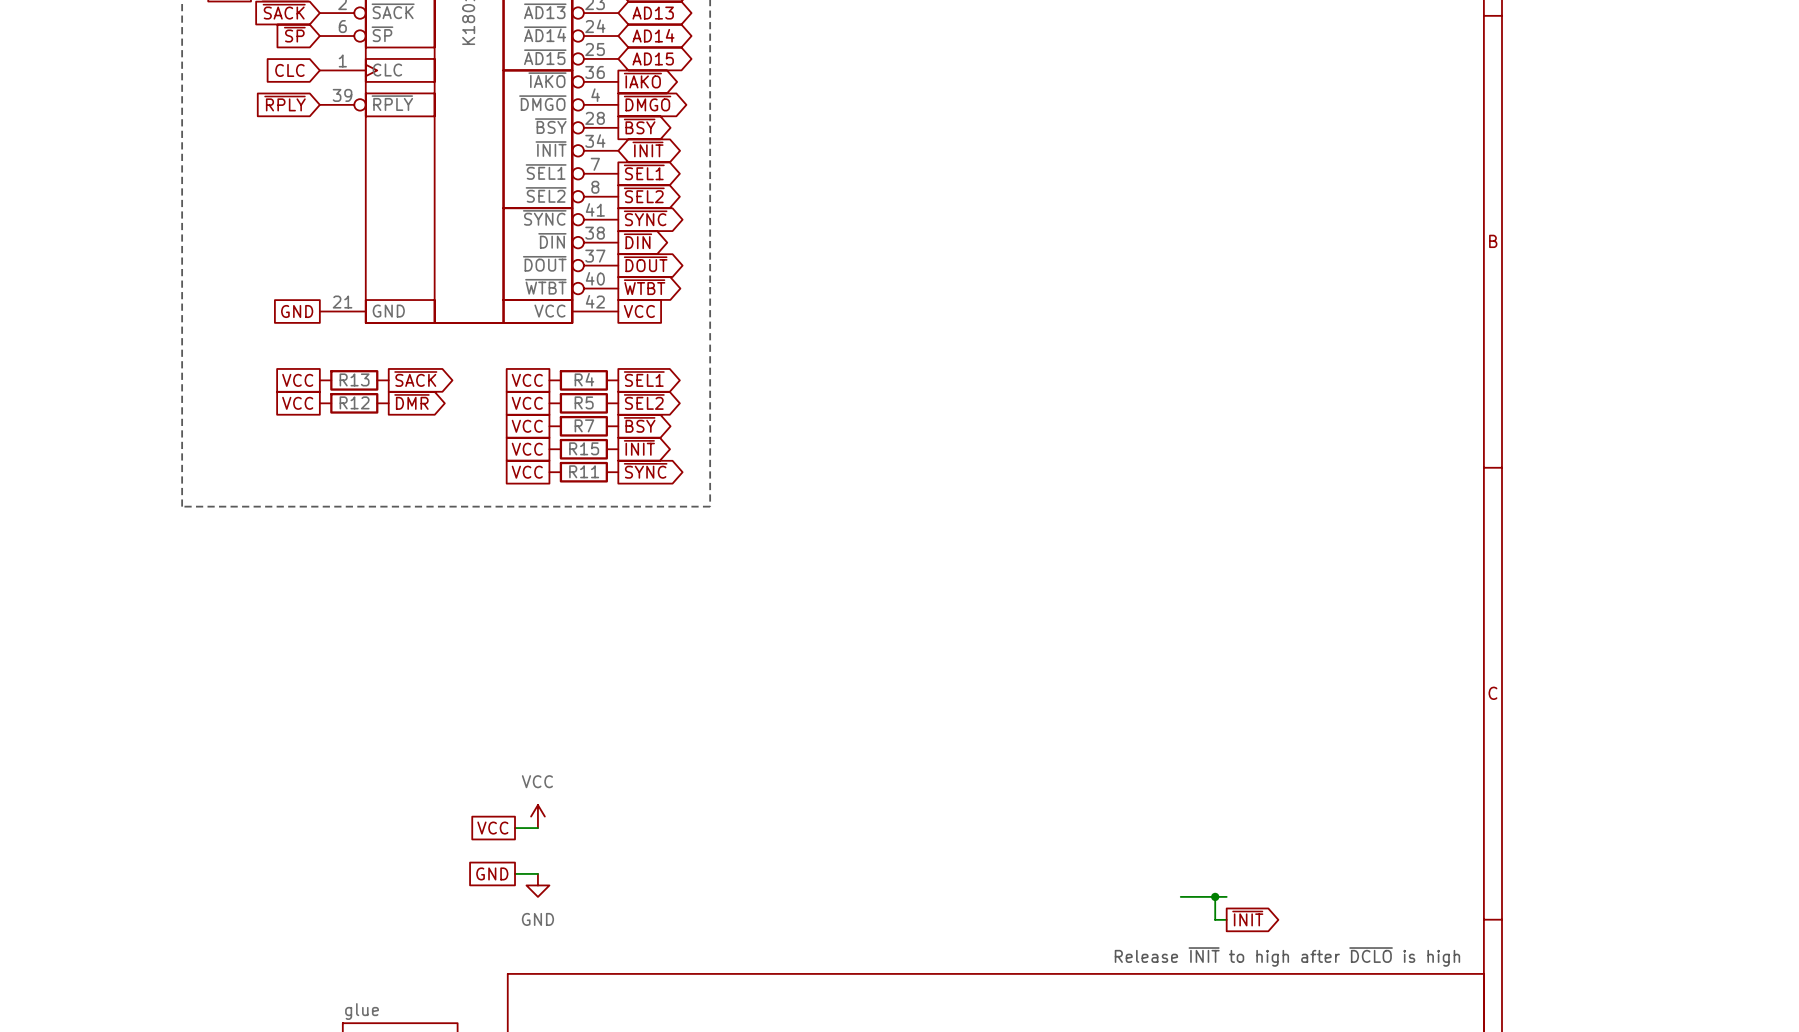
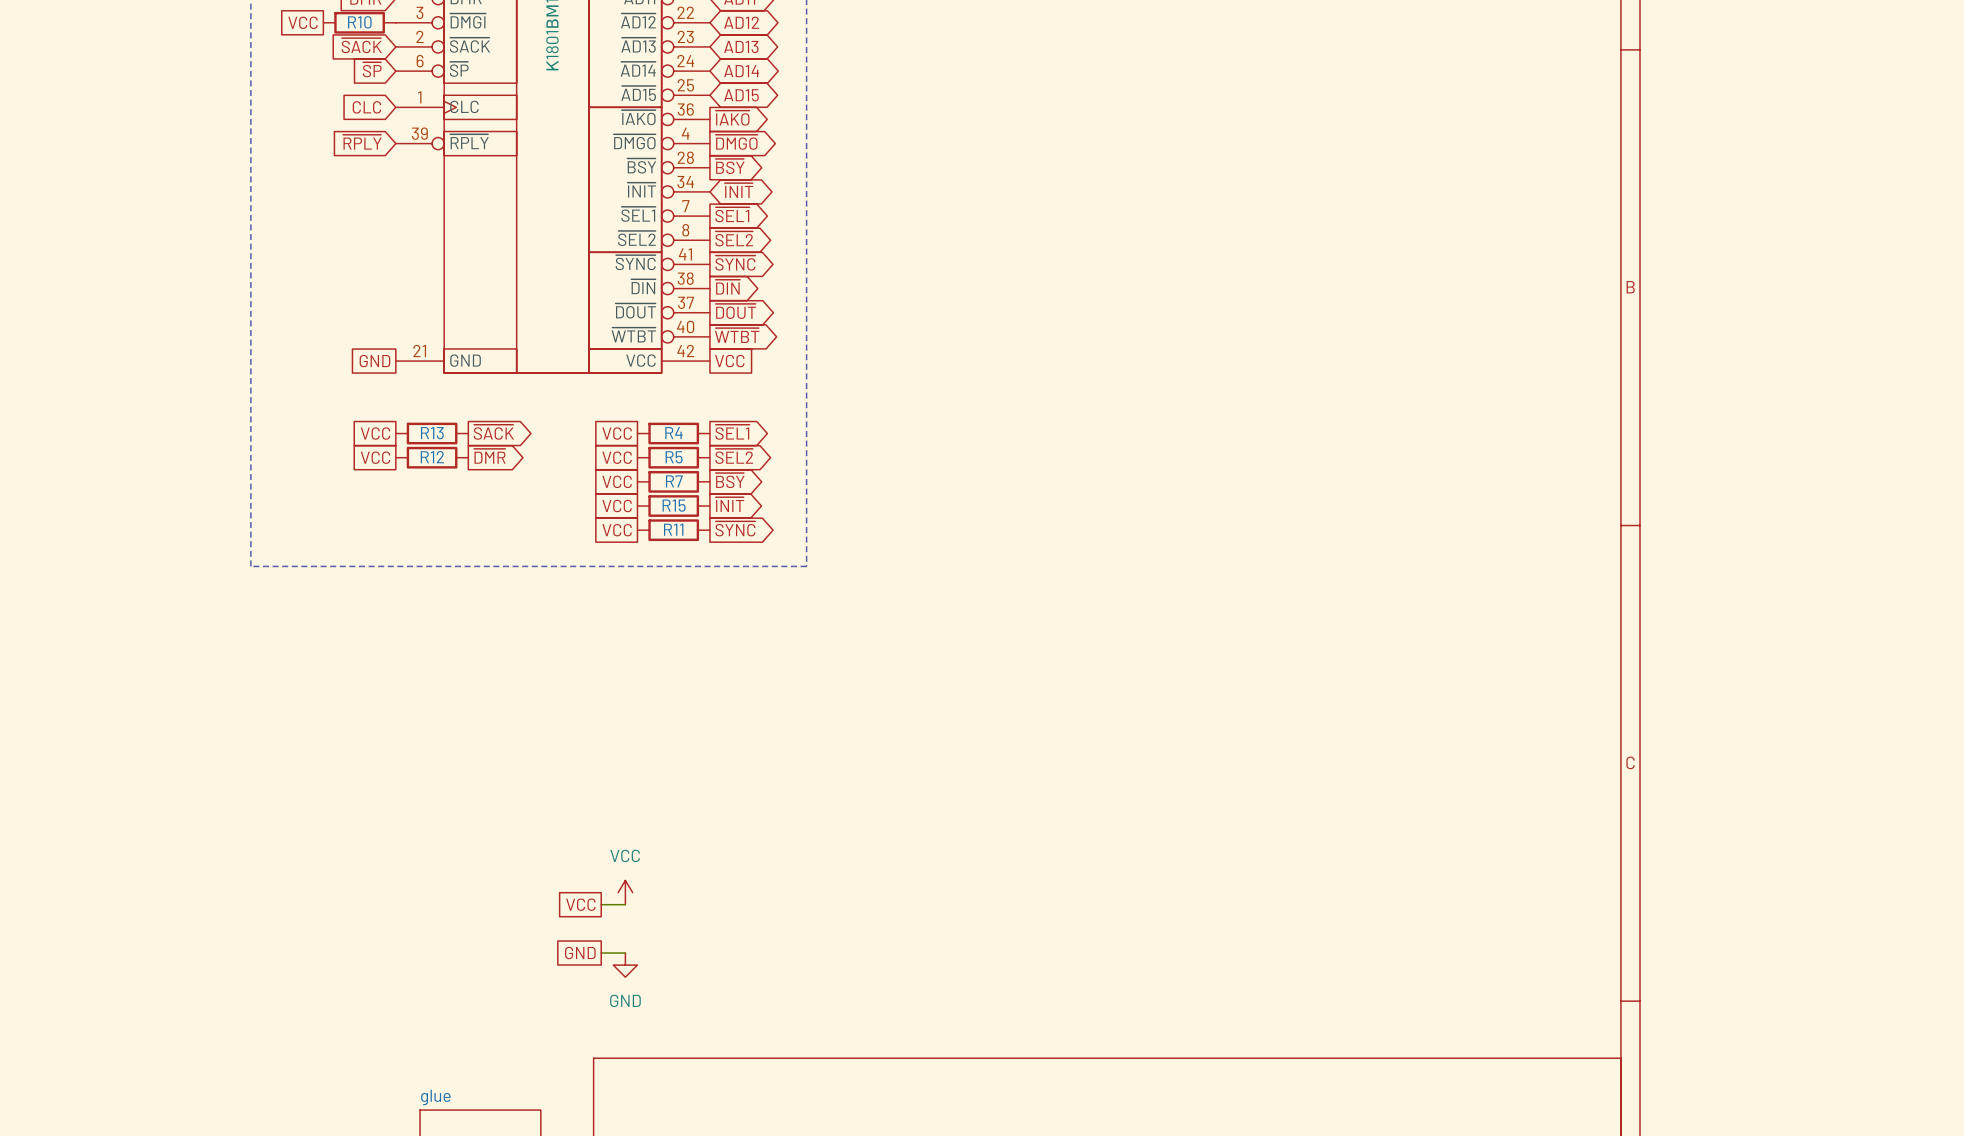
wire: (1180, 896) (1226, 896) -> none
wire: (1215, 896) (1215, 919) (1226, 919) -> none
junction: (1215, 896) -> none
global label: ~{INIT} (1247, 918) -> none
text: Release ~{INIT} to high after ~{DCLO} is high (1287, 956) -> none

